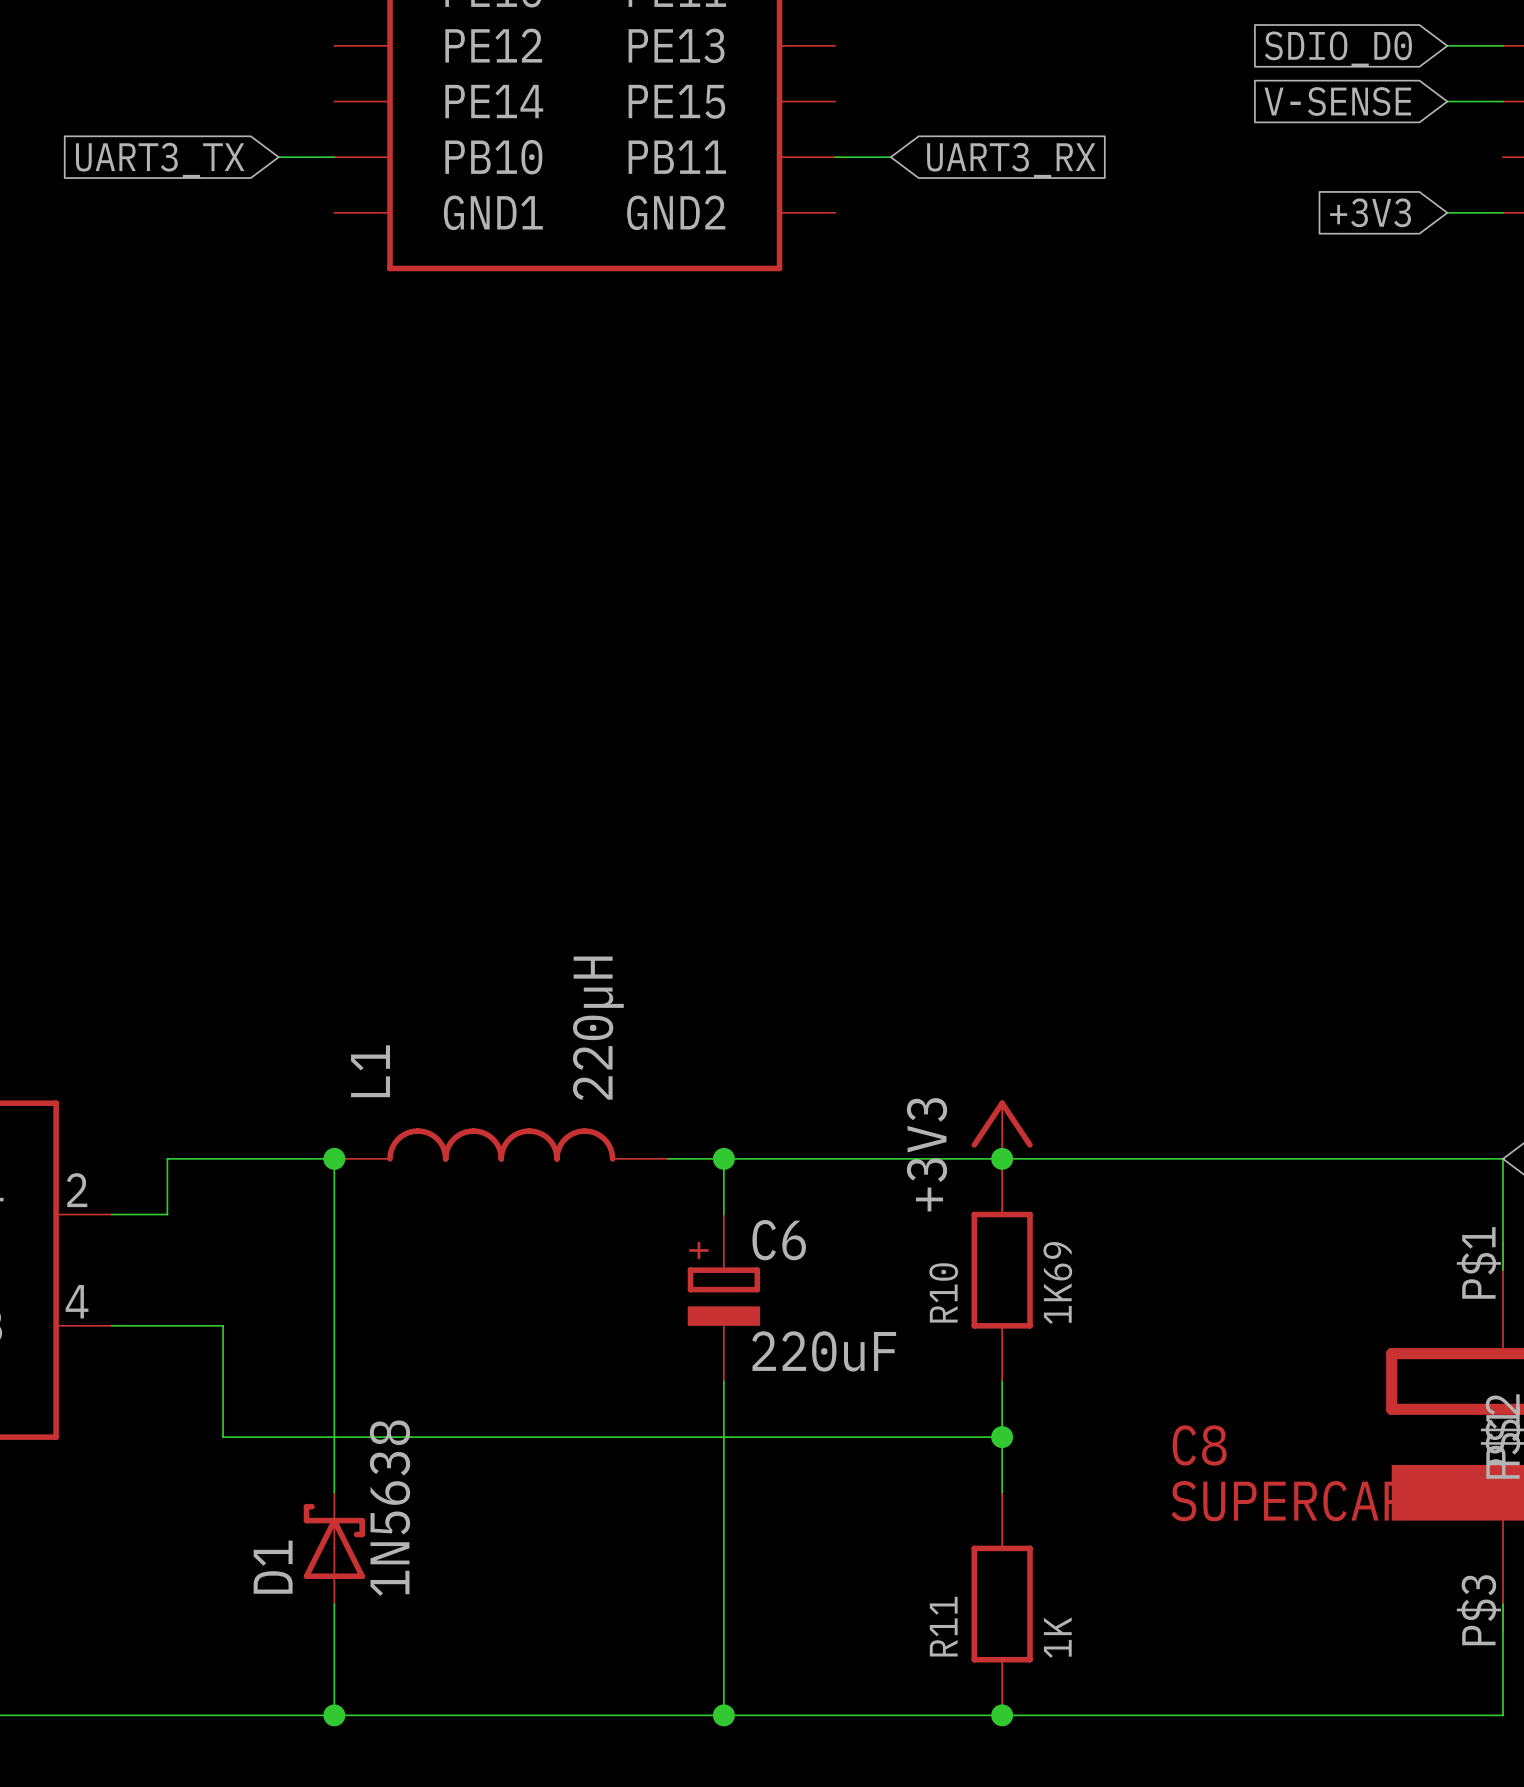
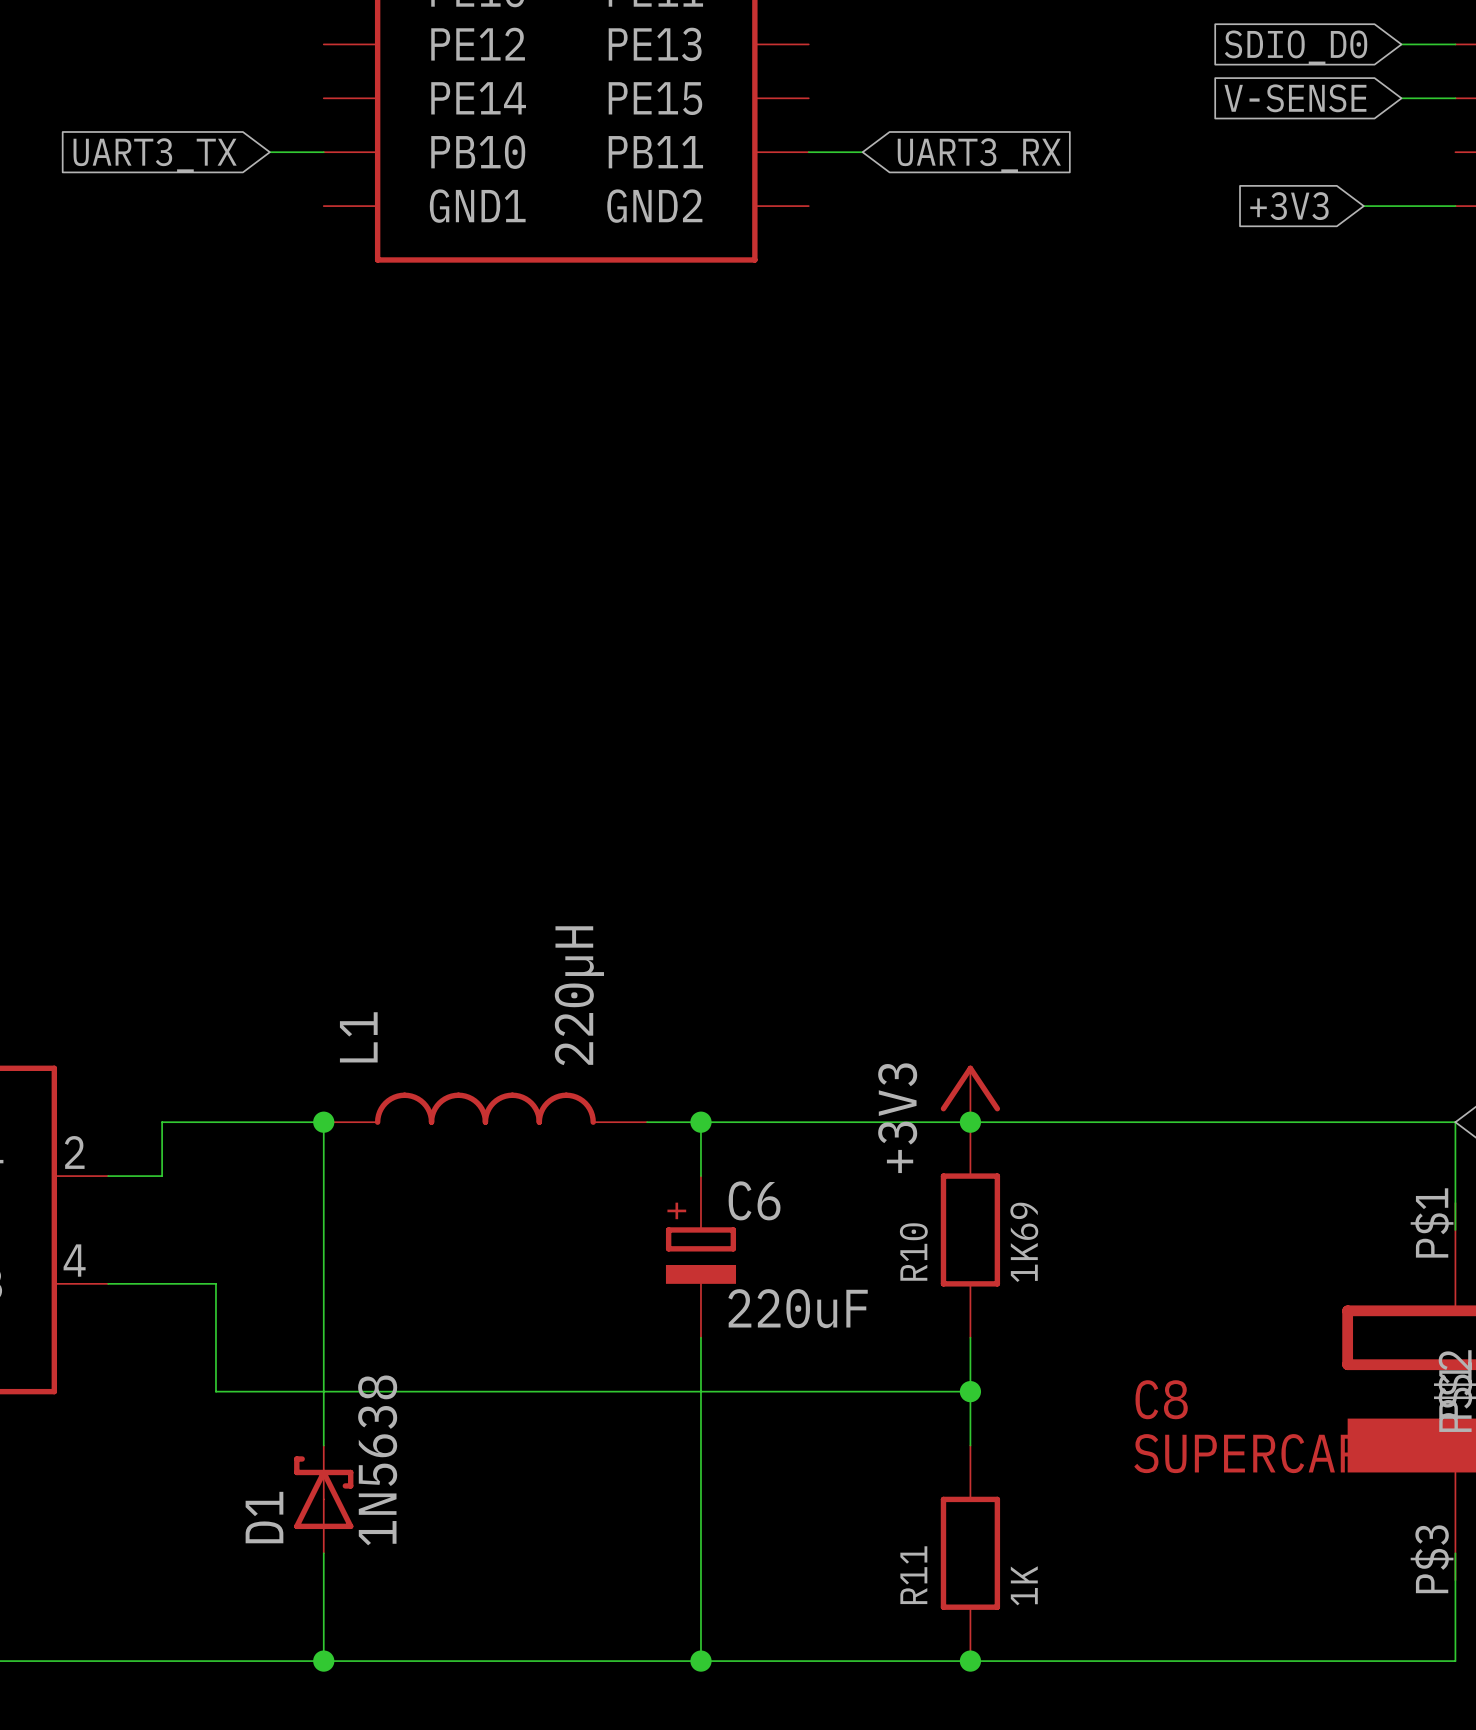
global label position: +3V3 (1370, 212) -> +3V3 (1289, 206)
wire: none -> (1363, 206) (1401, 206)

